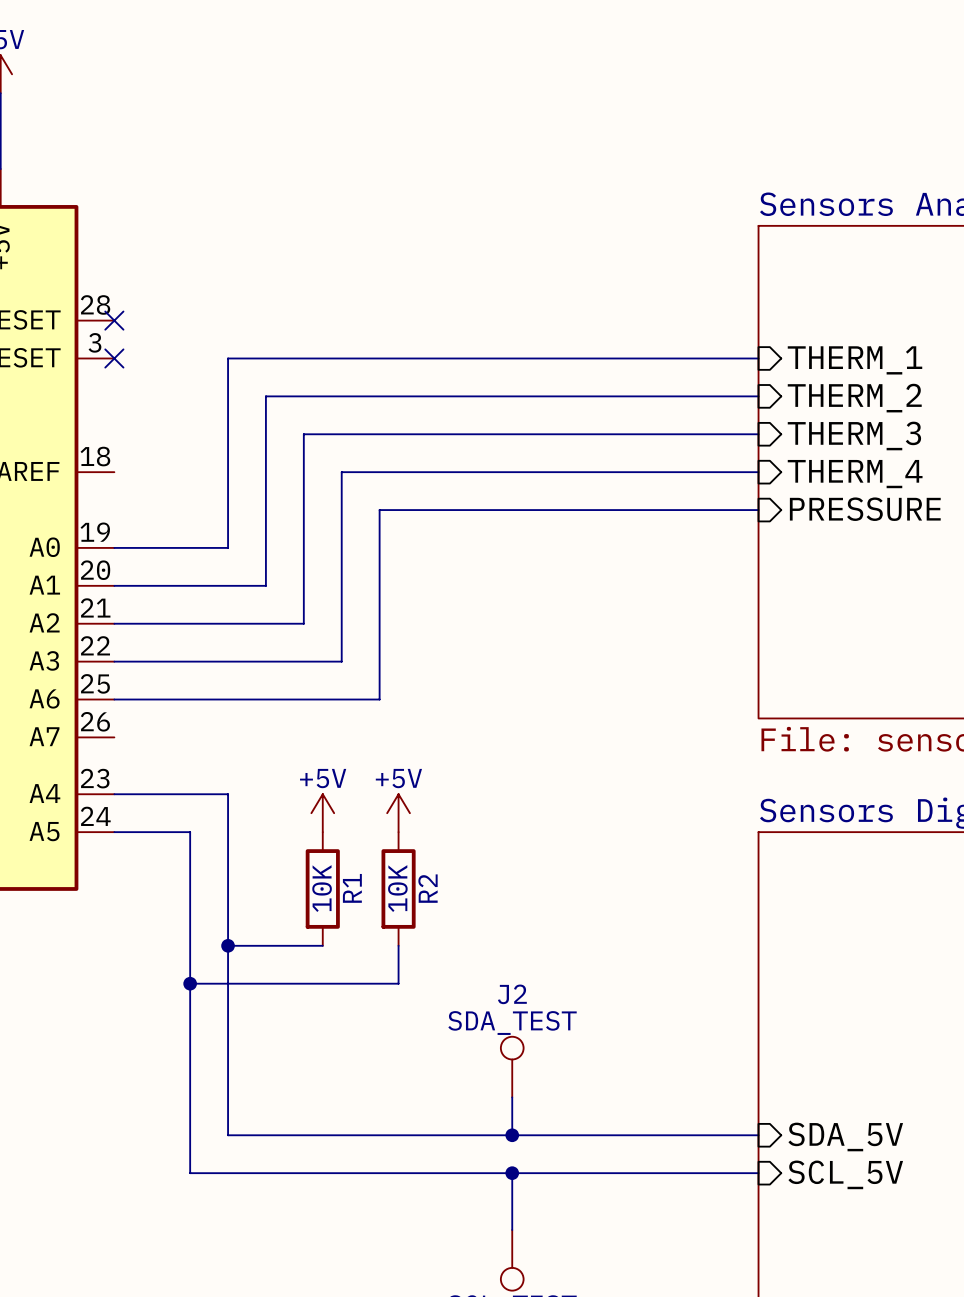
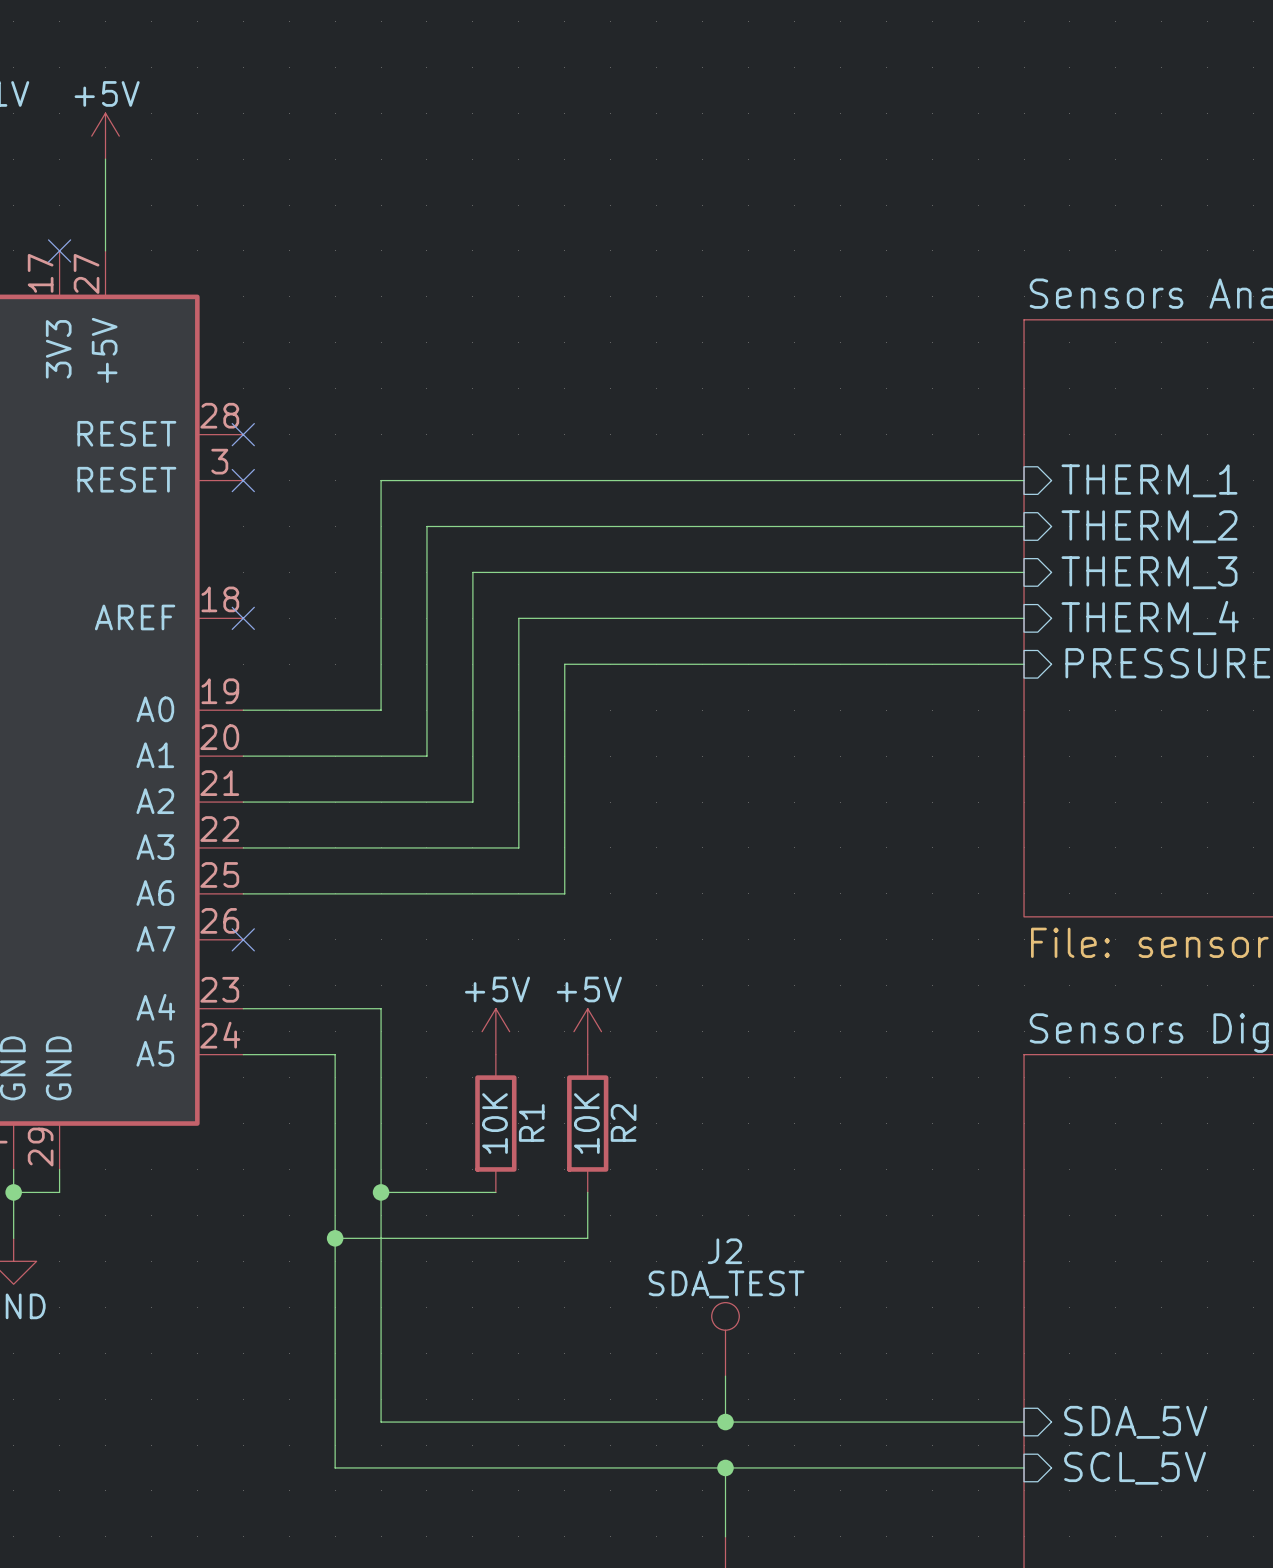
no-connect mark: none -> (243, 618)
no-connect mark: none -> (243, 939)

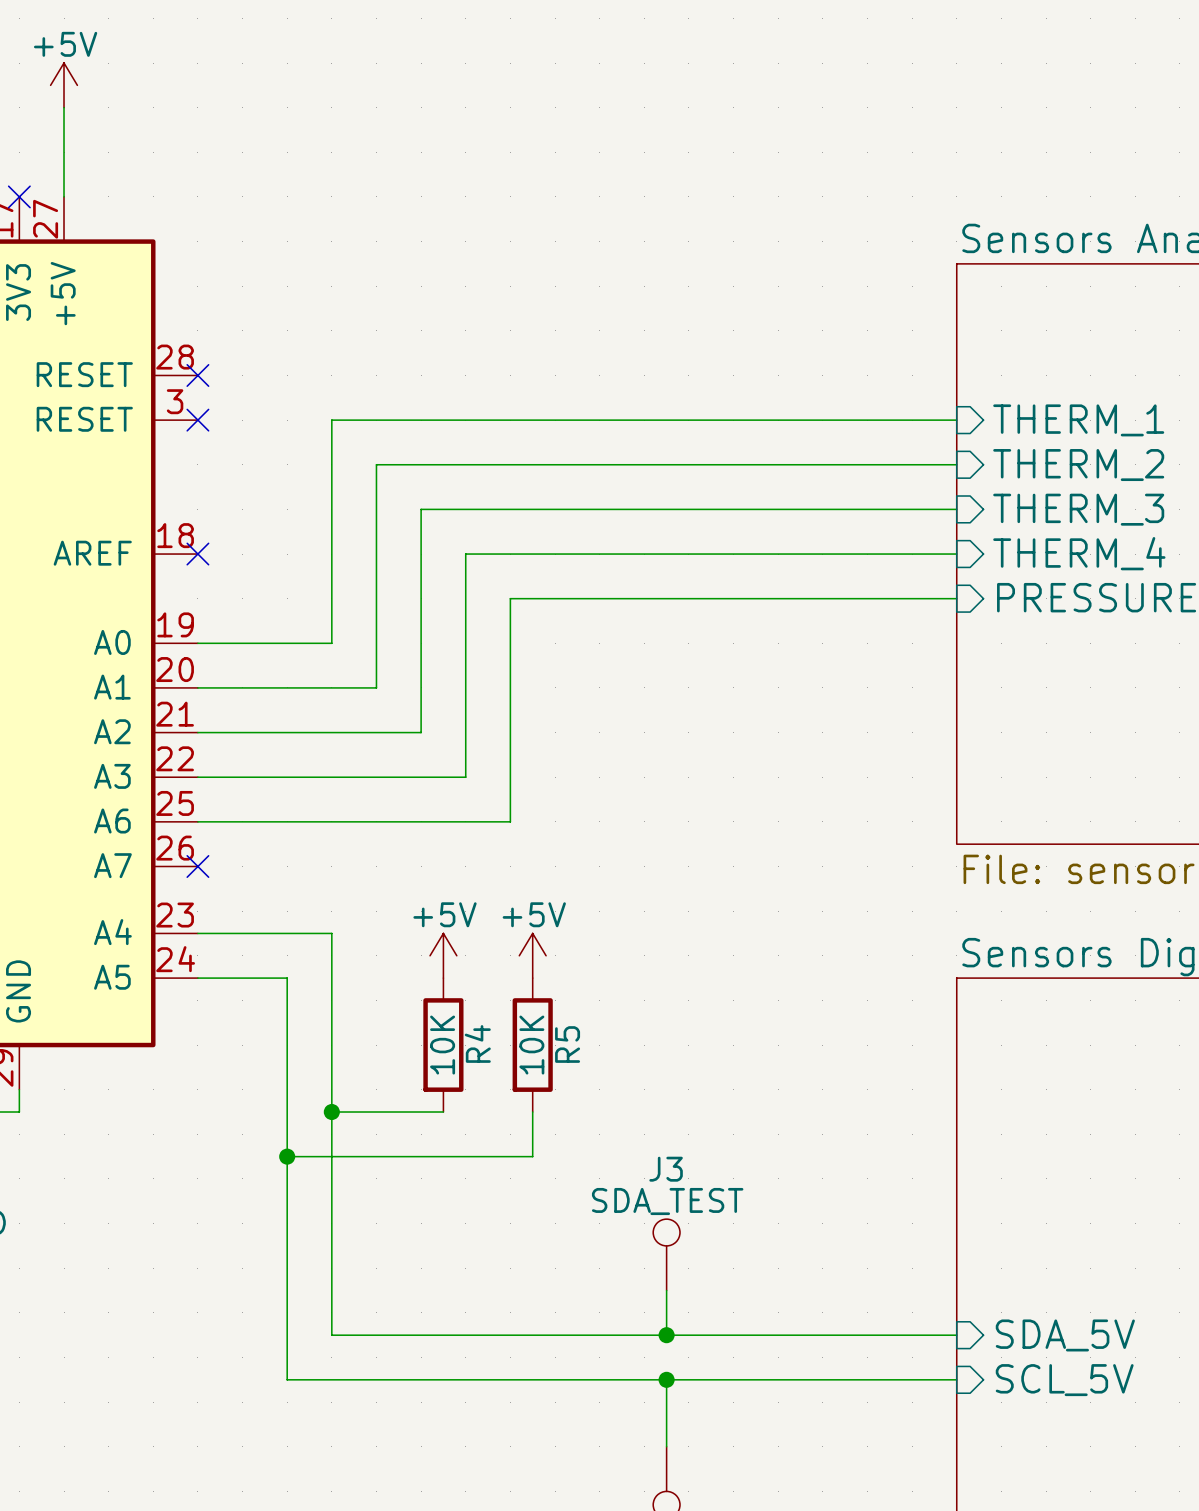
R1 name: R1 (531, 1122) -> R4 (477, 1043)
R2 name: R2 (623, 1122) -> R5 (567, 1044)
J2 name: J2 (724, 1251) -> J3 (666, 1169)

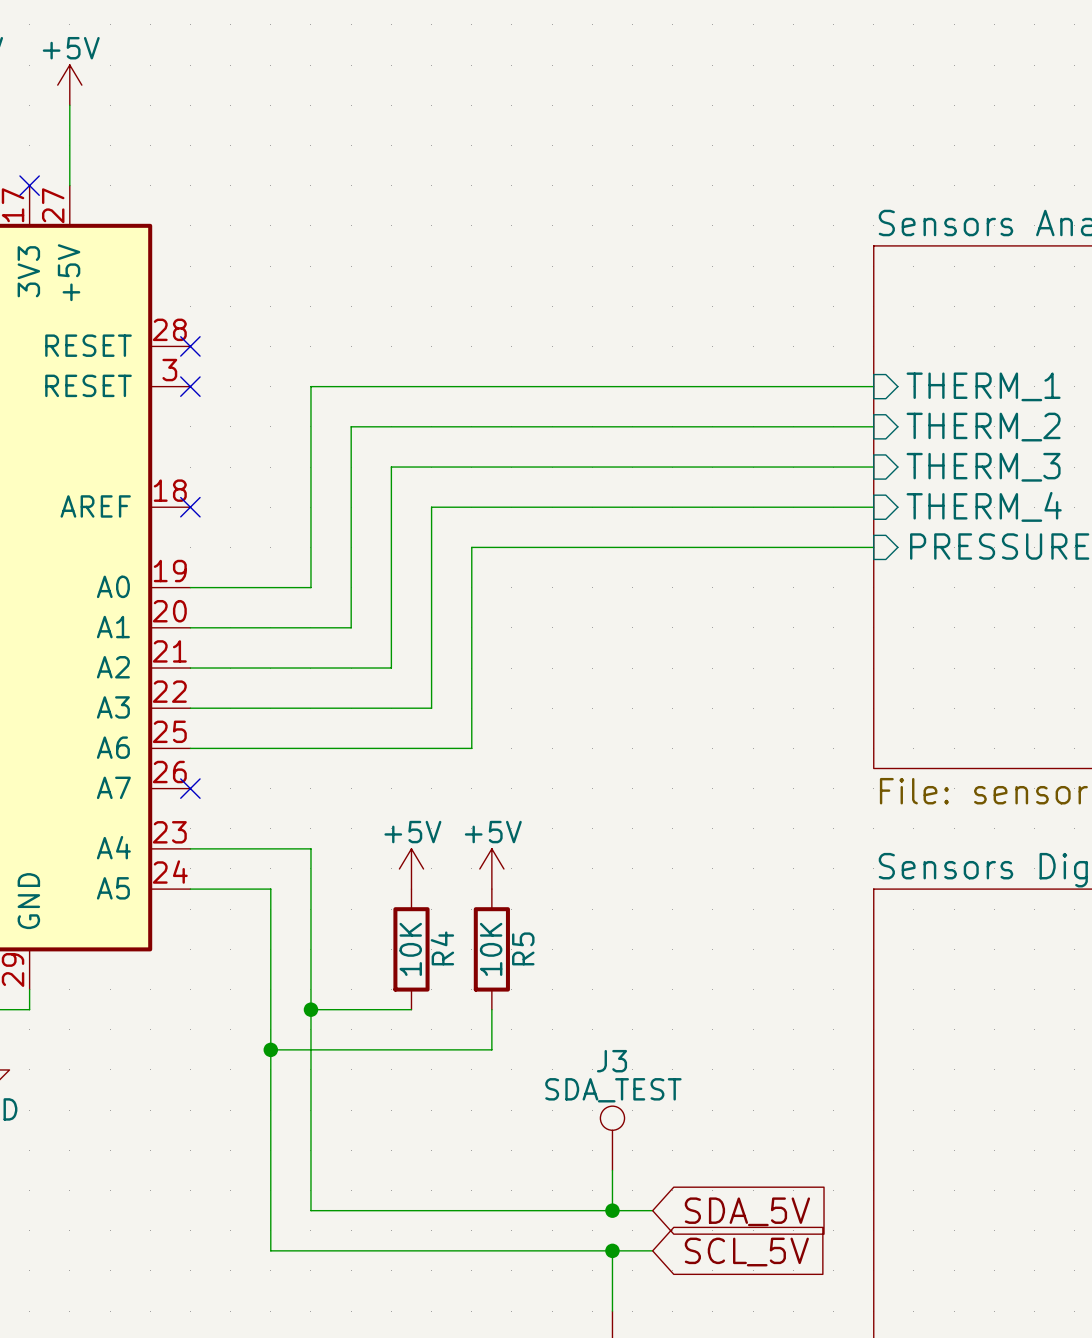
wire: (711, 1335) (956, 1335) -> none
sheet pin: SDA_5V (1065, 1335) -> none
global label: none -> SDA_5V (747, 1211)
wire: (711, 1379) (956, 1379) -> none
sheet pin: SCL_5V (1064, 1380) -> none
global label: none -> SCL_5V (746, 1252)

